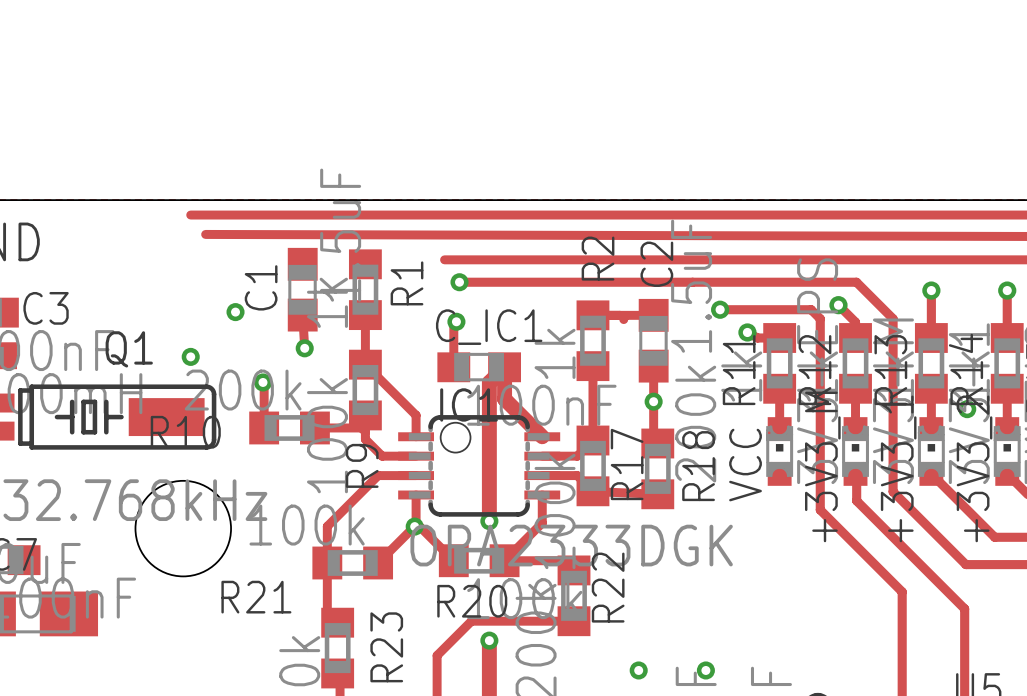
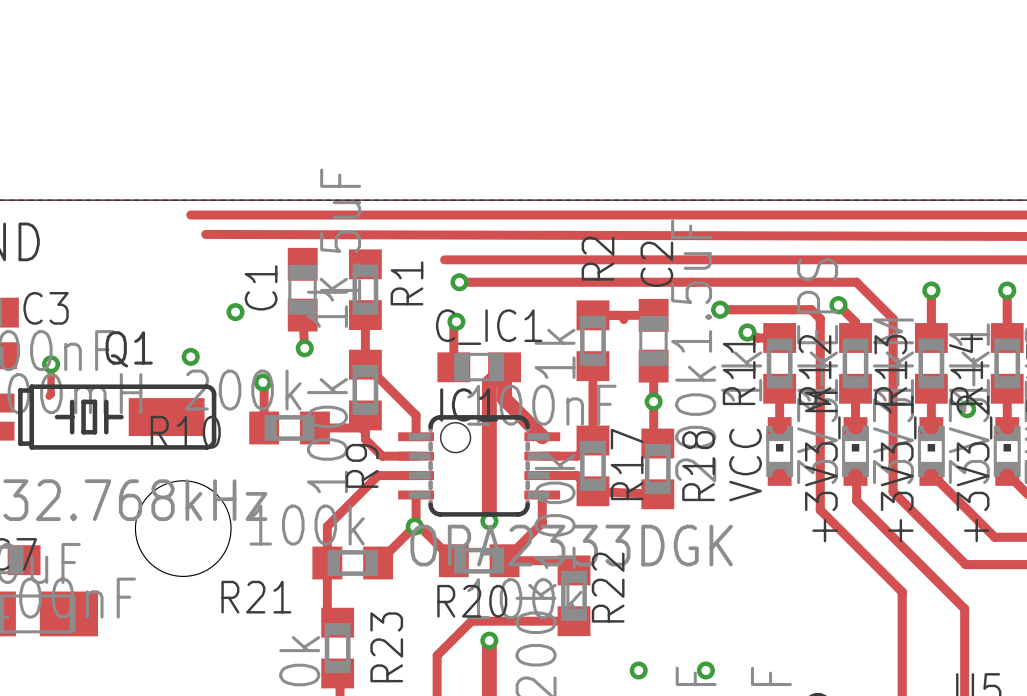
track: none -> (51, 364) (51, 394) (49, 396)
via: none -> (51, 364)

